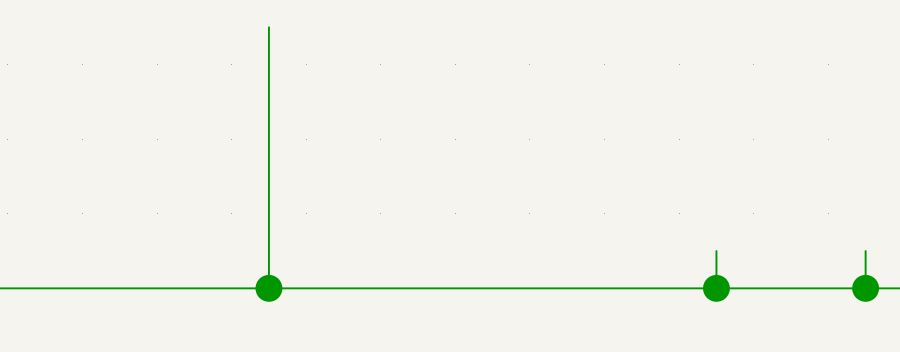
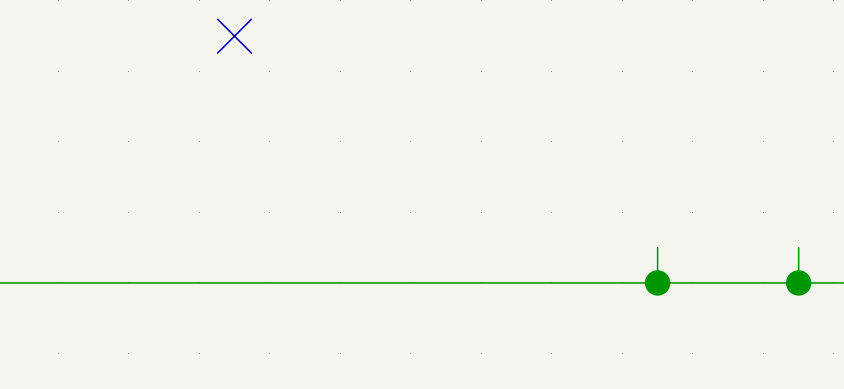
wire: (268, 27) (268, 288) -> none
no-connect mark: none -> (234, 36)
junction: (268, 288) -> none

